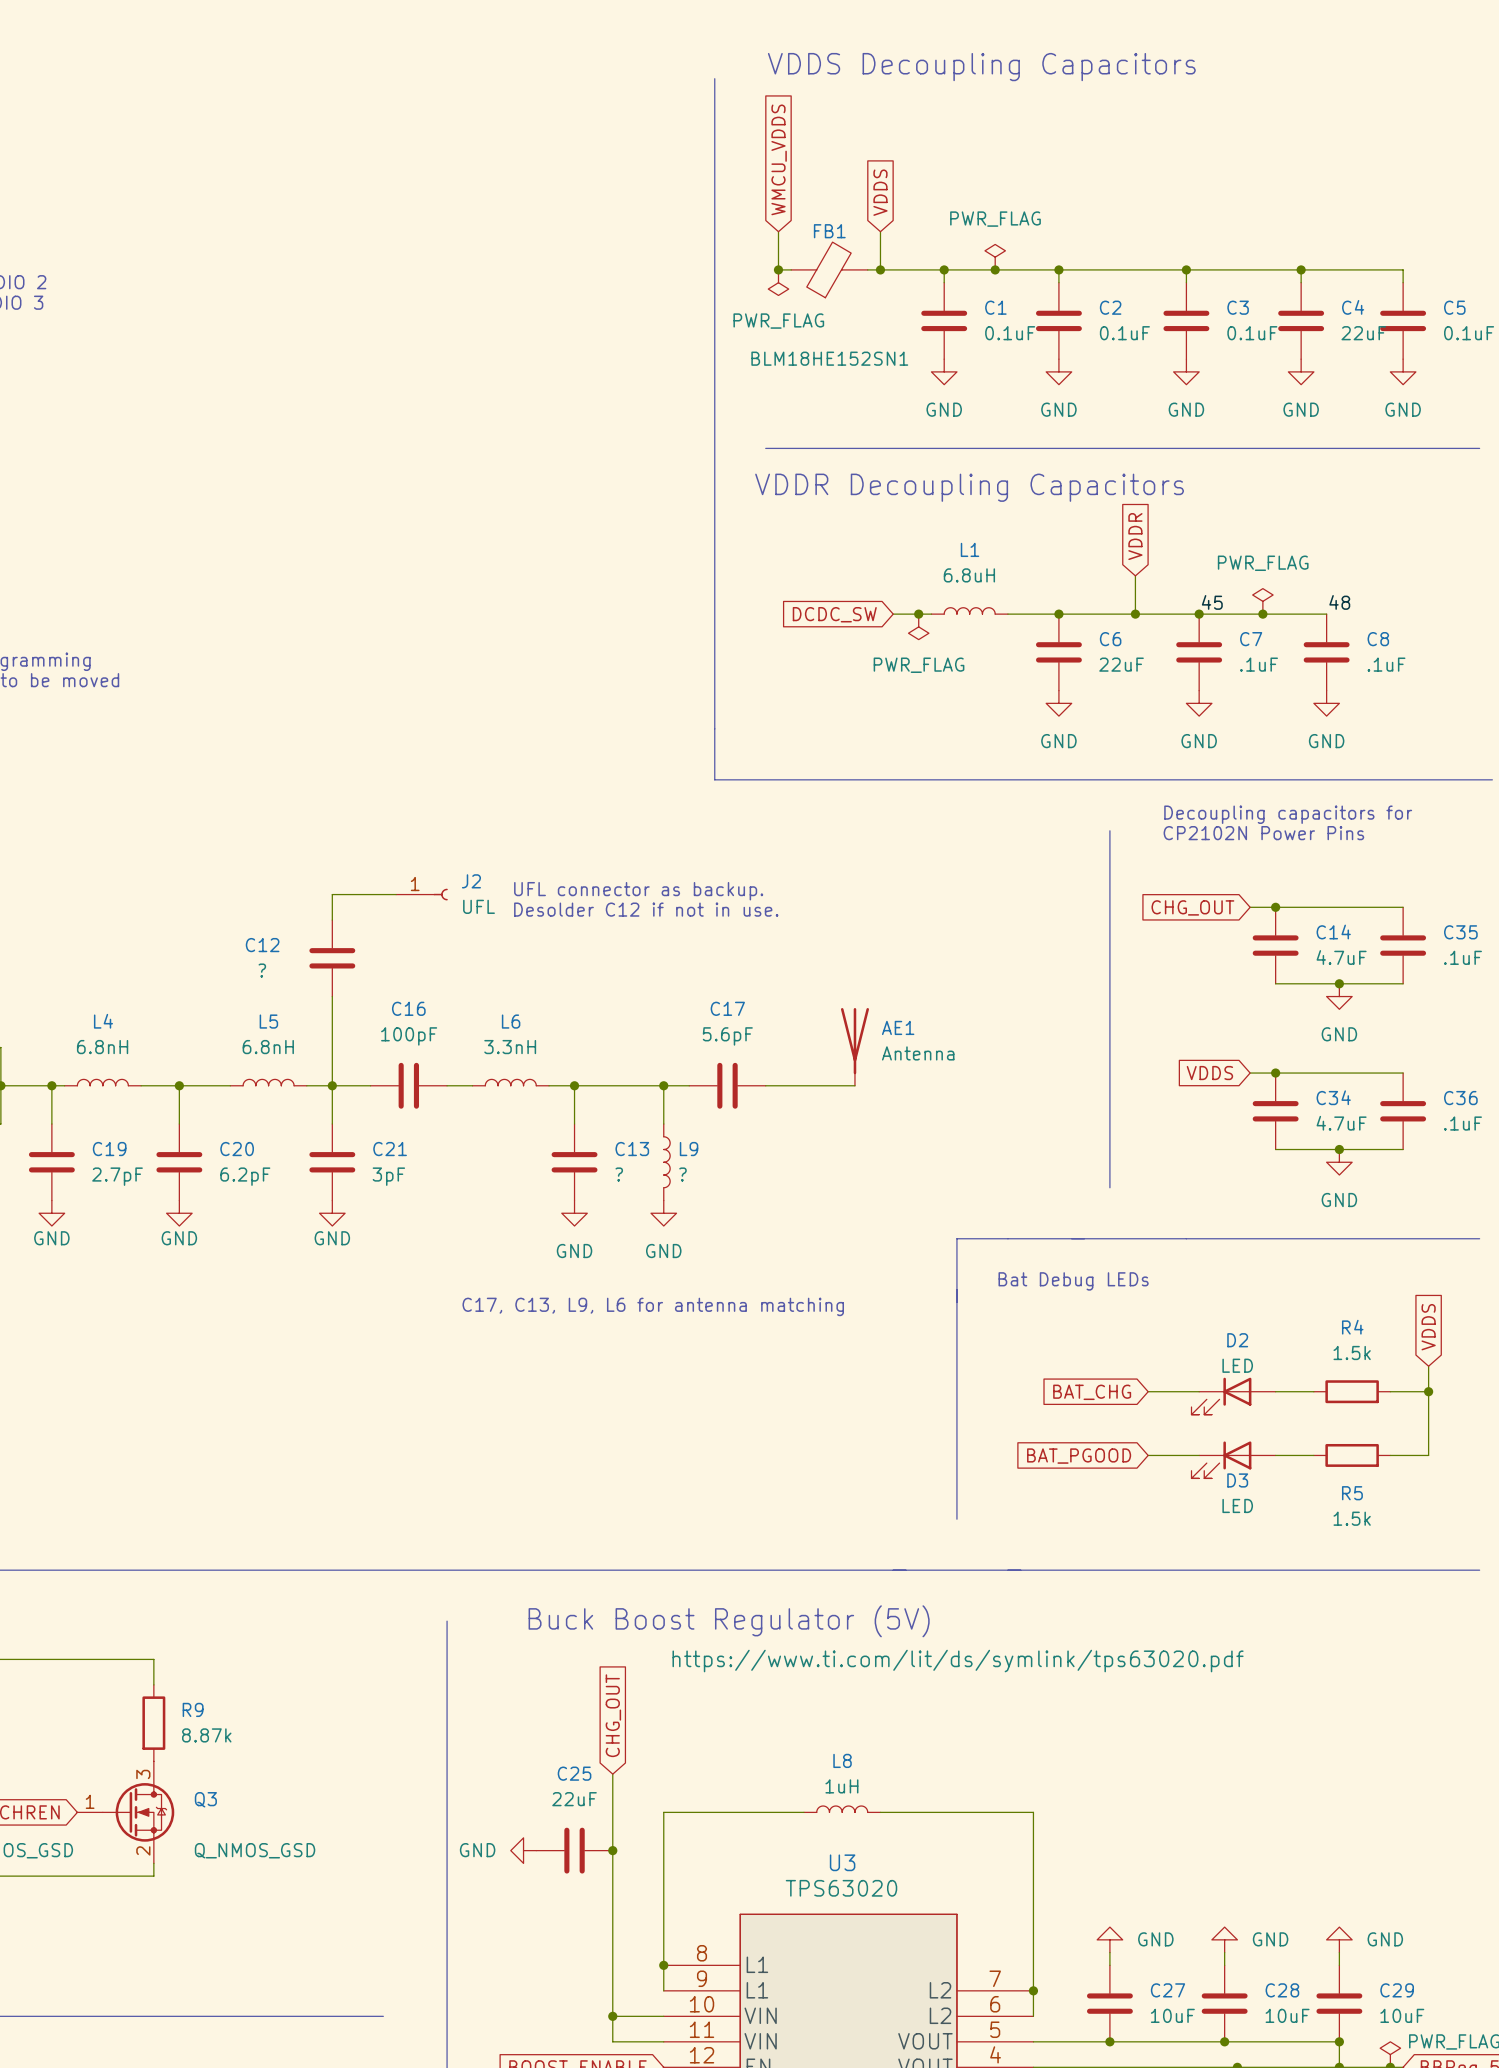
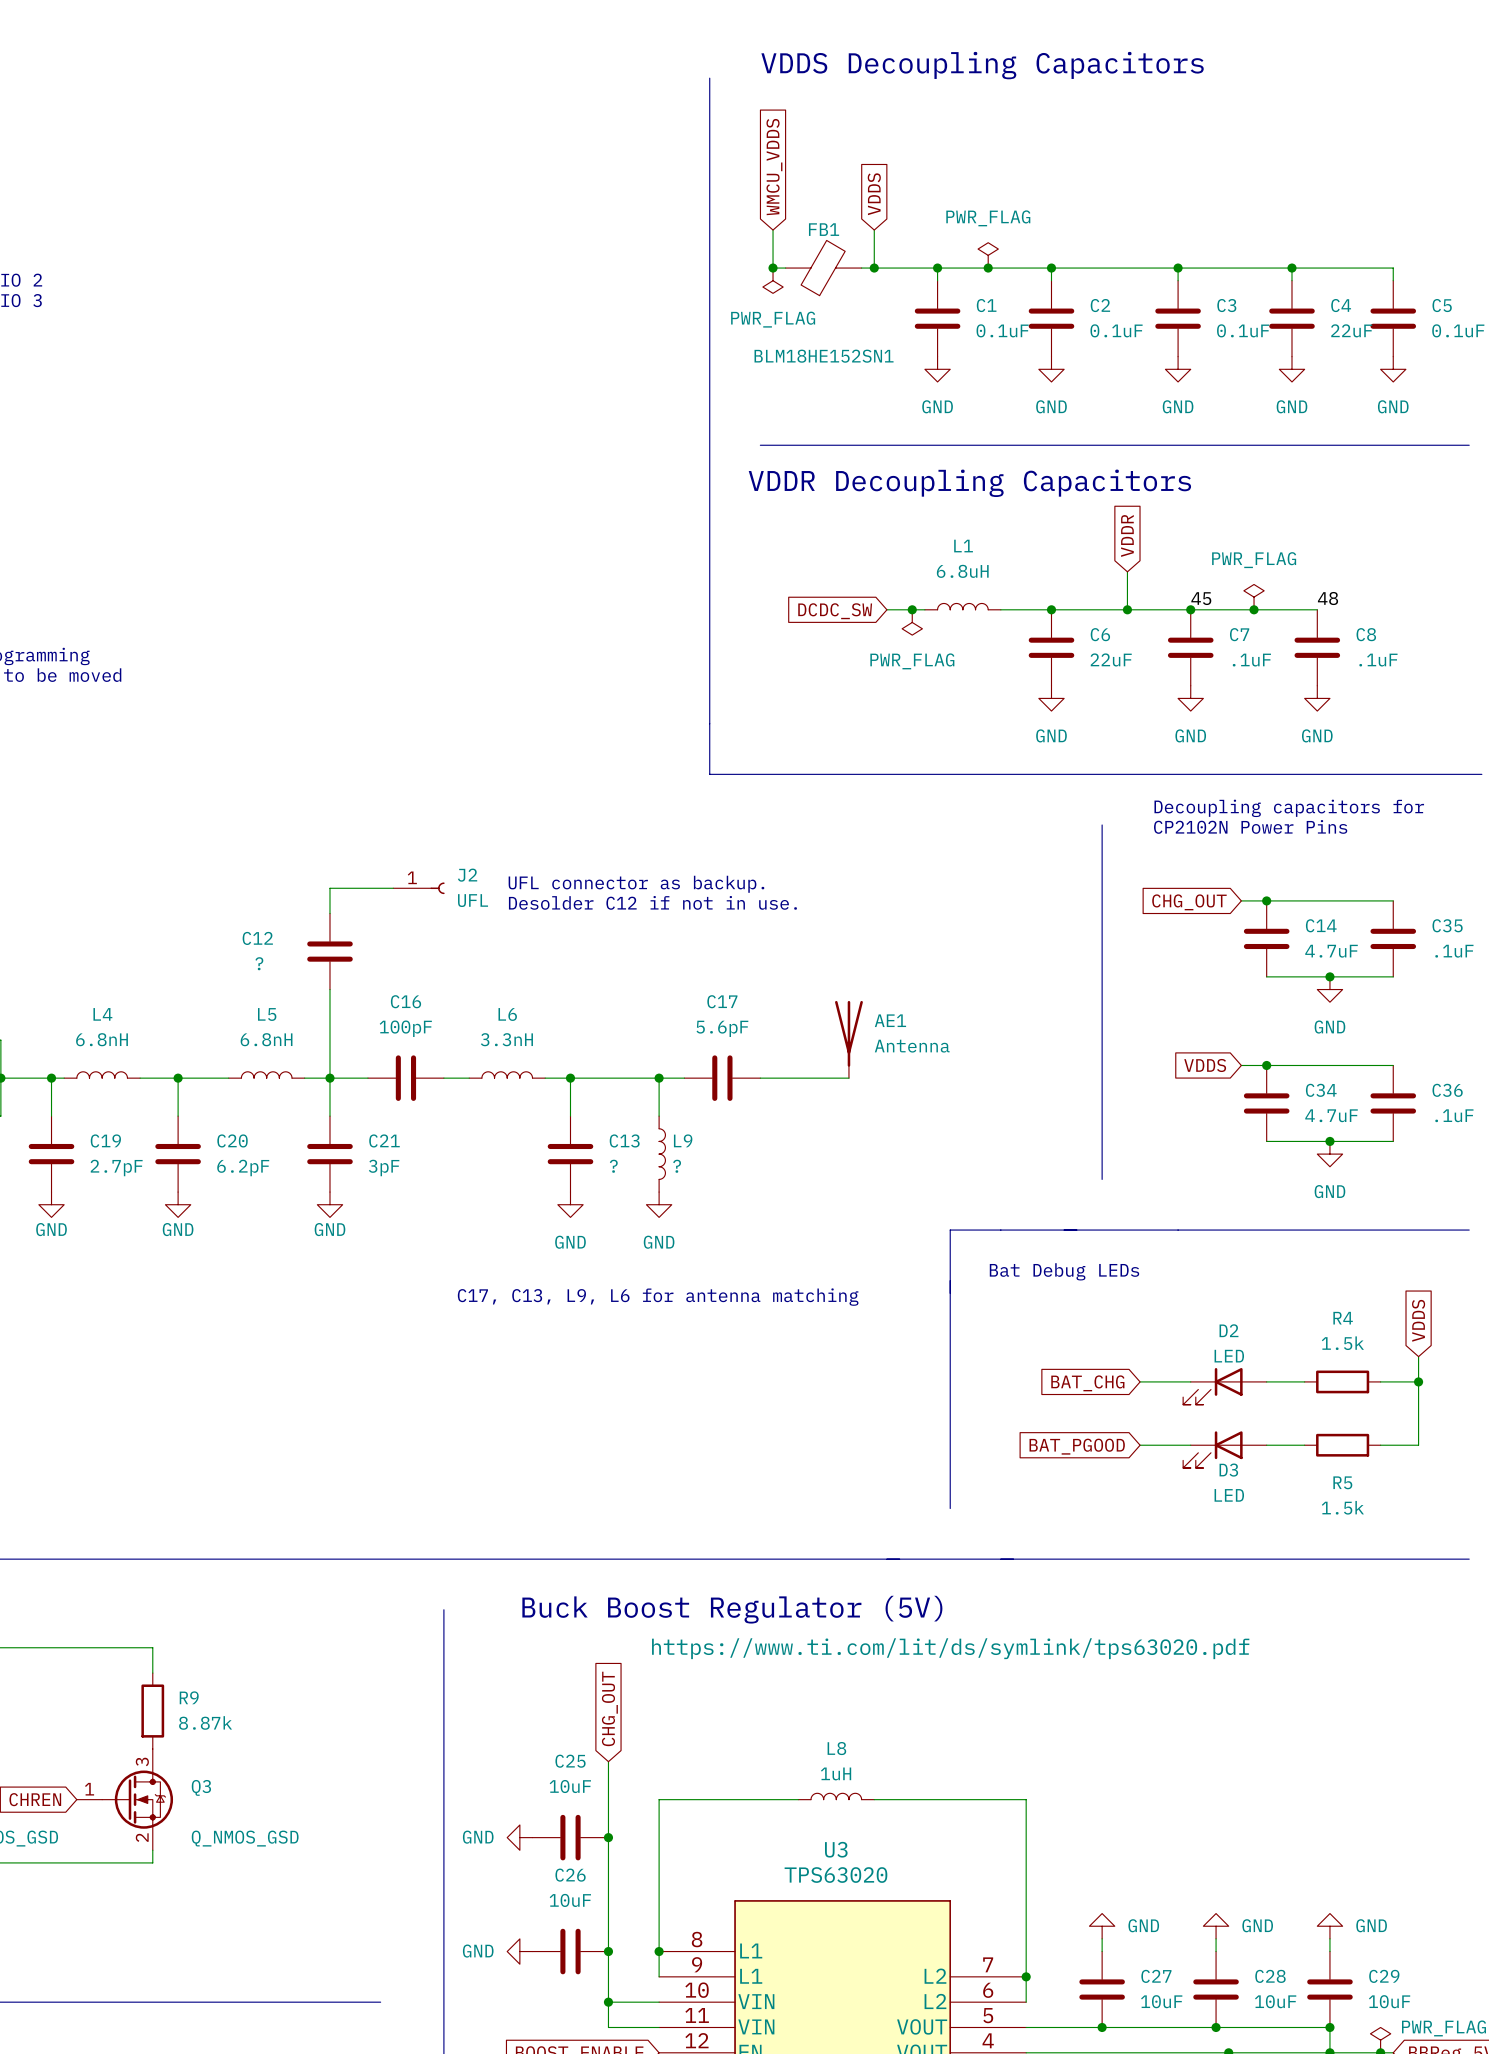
C25 value: 22uF (574, 1799) -> 10uF (570, 1786)
power symbol: none -> GND (519, 1951)
C26: none -> 10uF (570, 1951)
junction: none -> (608, 1951)

